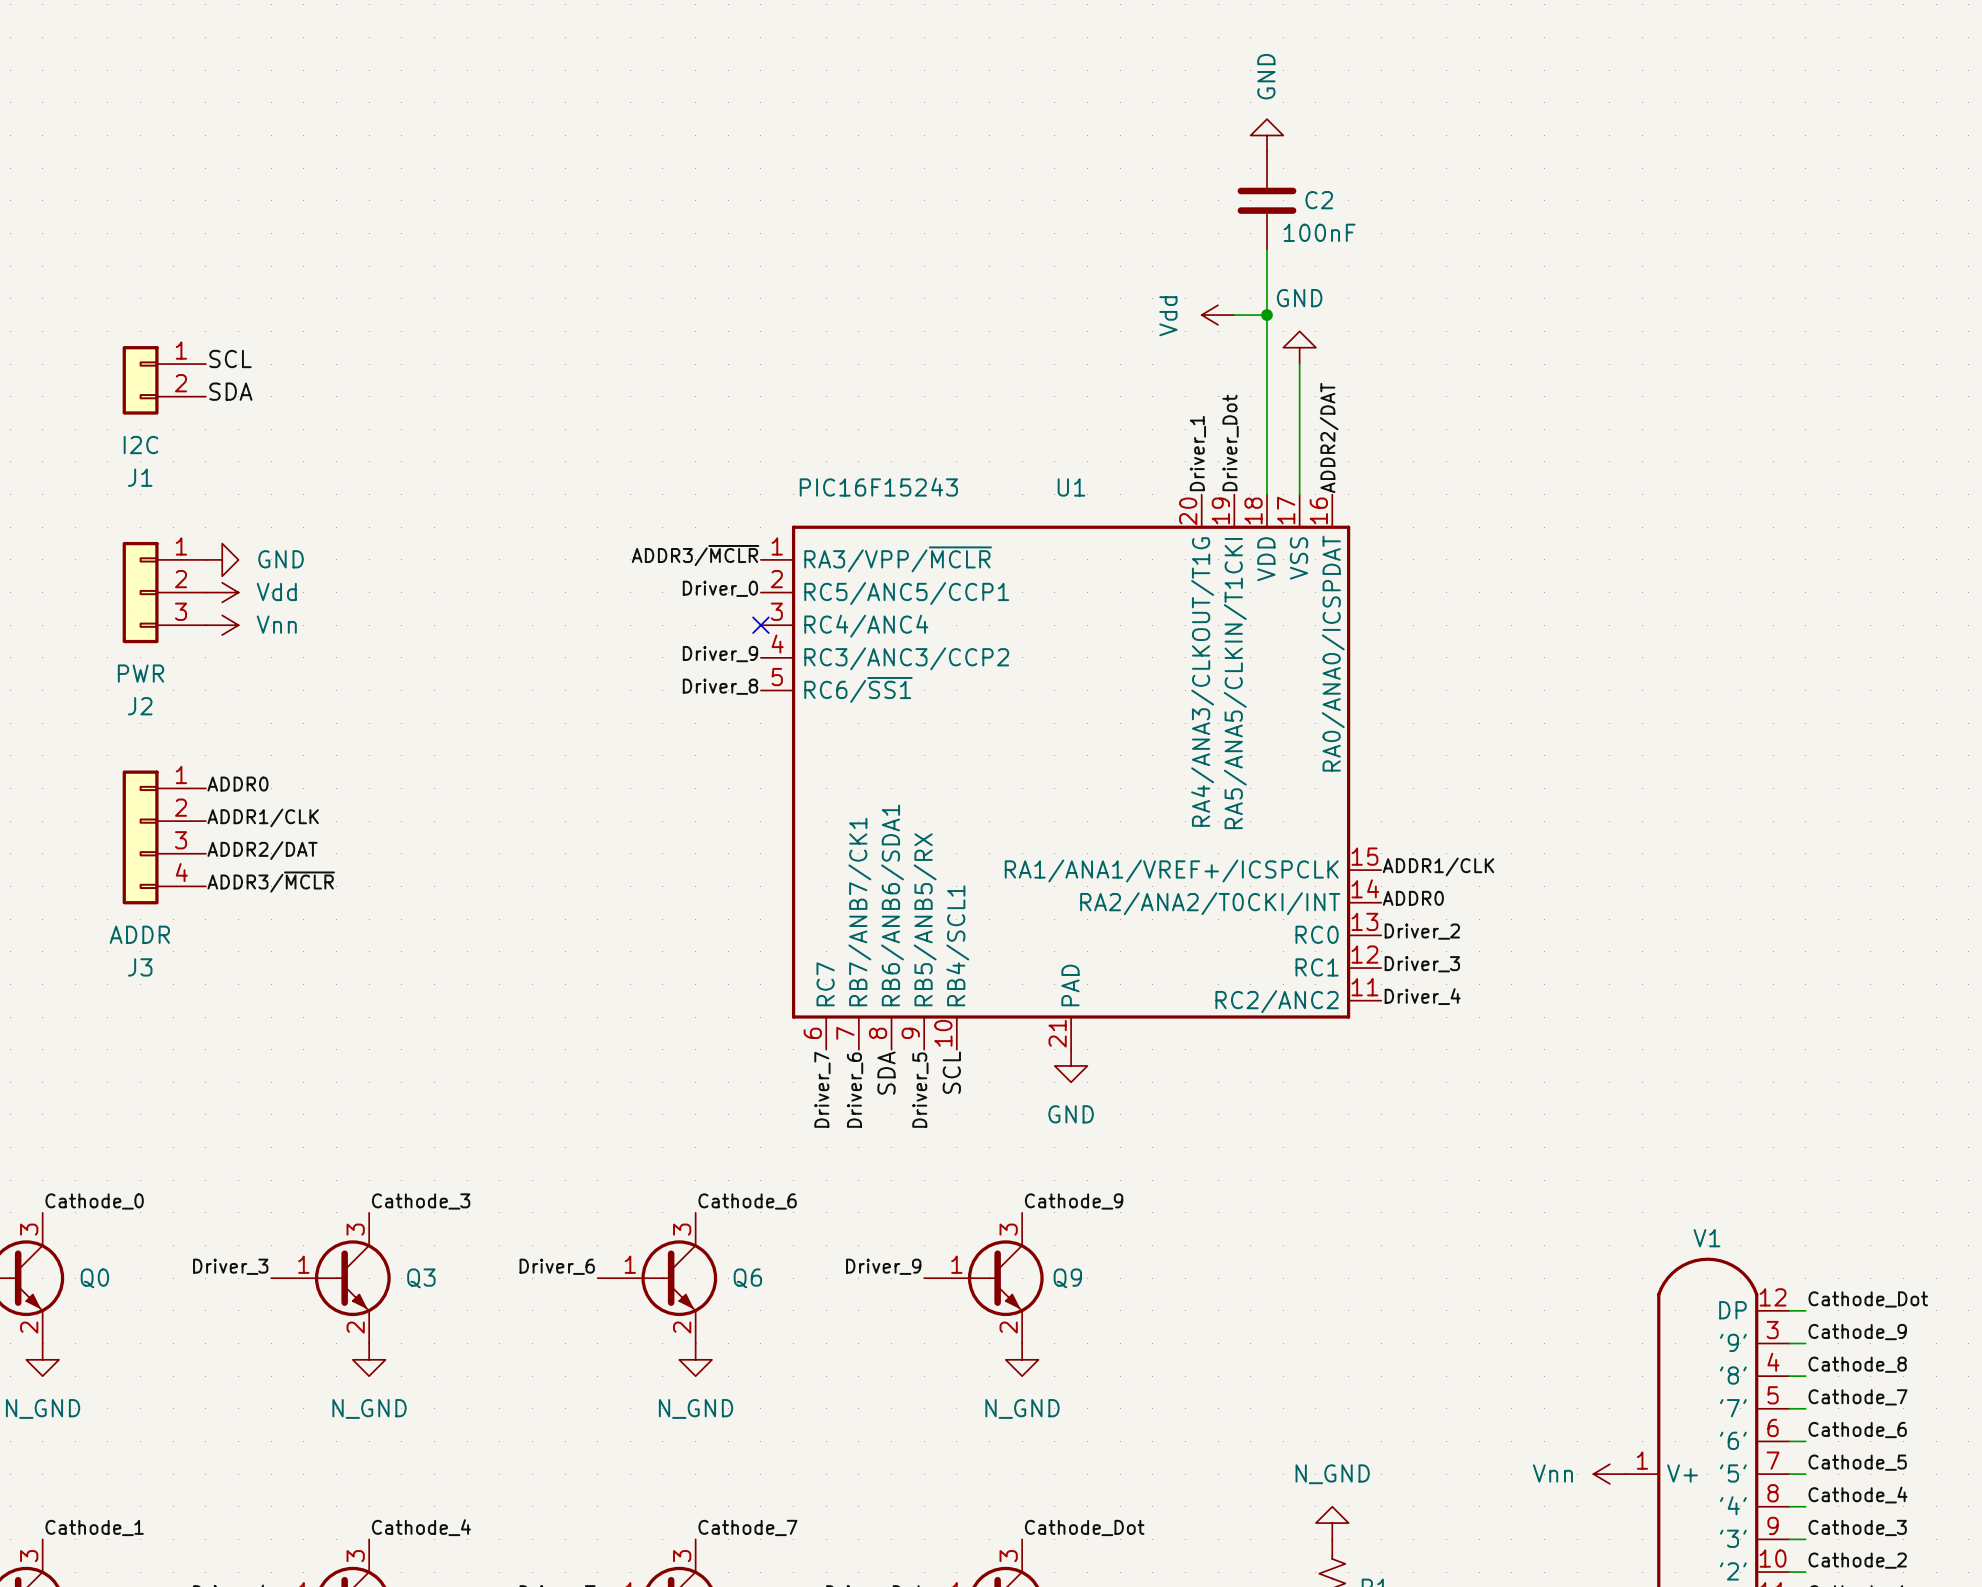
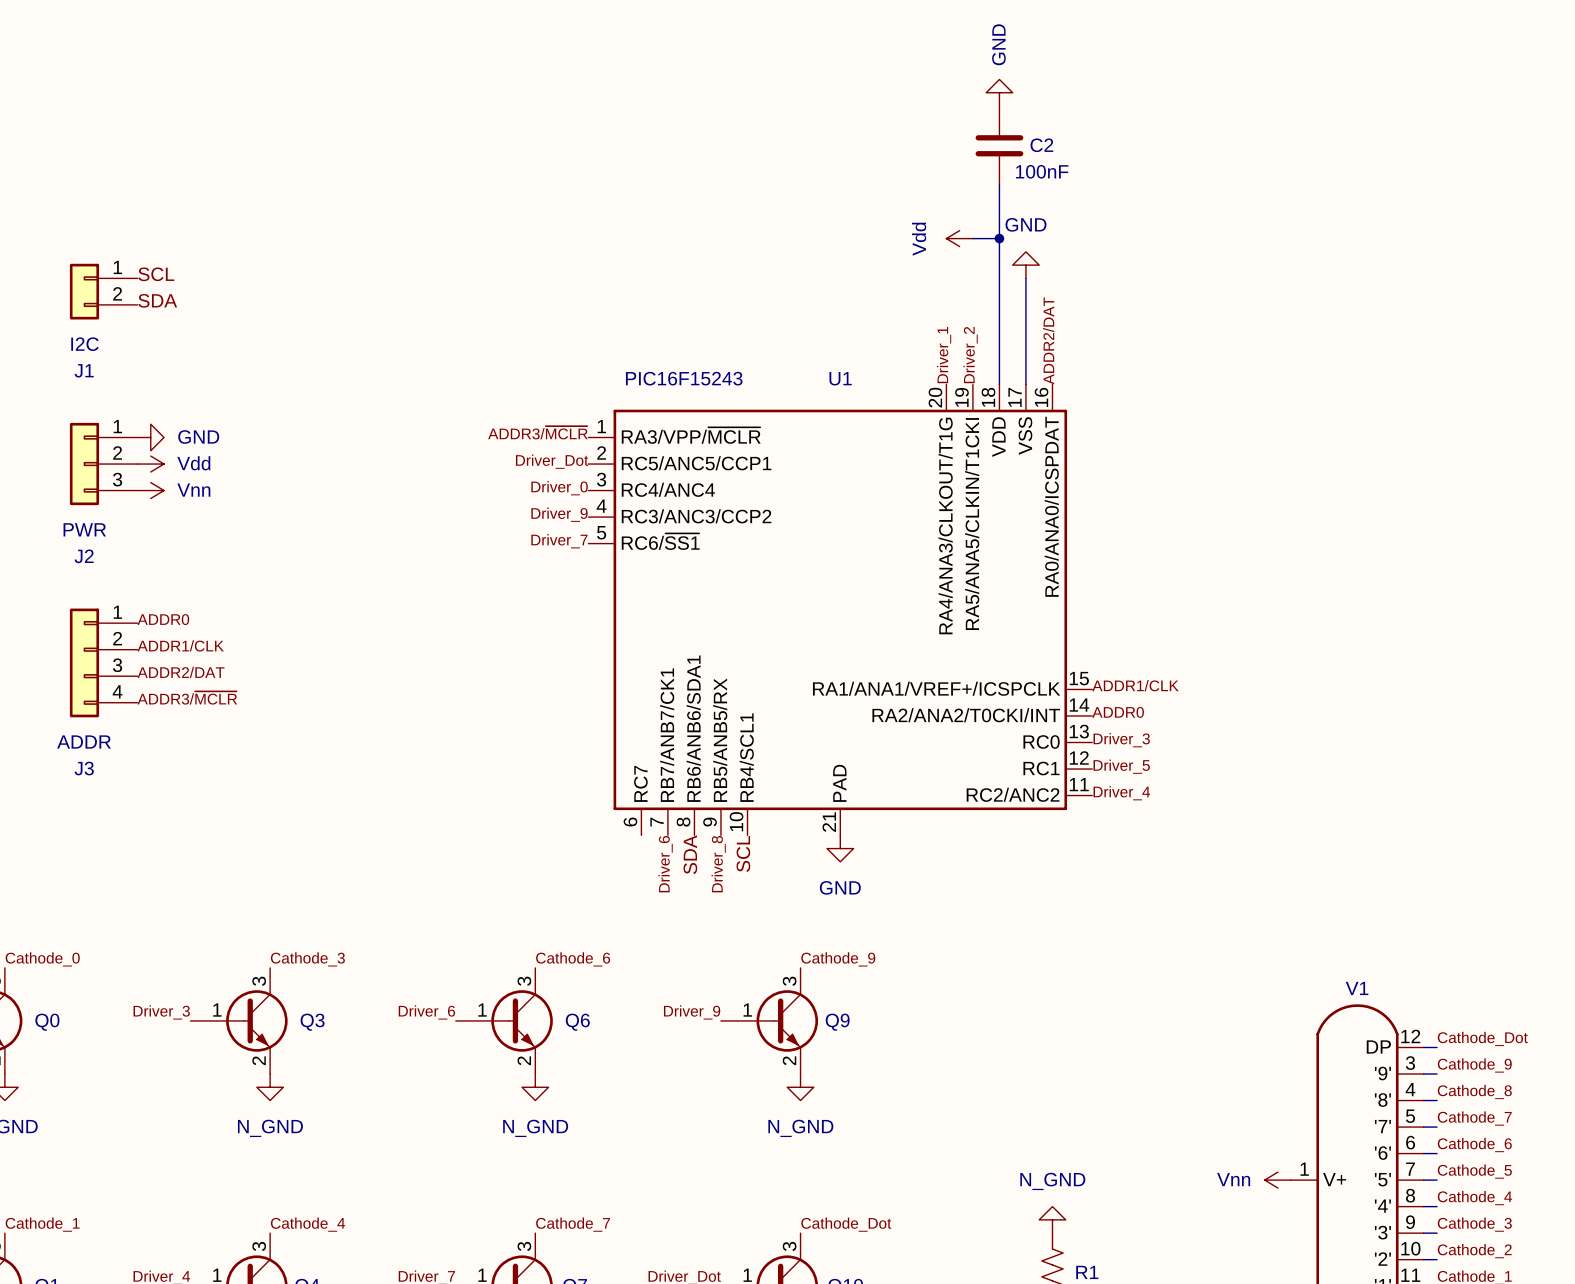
label: Driver_Dot (1230, 442) -> Driver_2 (970, 355)
label: Driver_0 (720, 588) -> Driver_Dot (552, 461)
label: none -> Driver_0 (559, 488)
no-connect mark: (760, 625) -> none
label: Driver_8 (720, 686) -> Driver_7 (559, 541)
label: Driver_2 (1422, 931) -> Driver_3 (1121, 740)
label: Driver_3 (1422, 964) -> Driver_5 (1121, 766)
label: Driver_7 (822, 1089) -> none
label: Driver_5 (920, 1090) -> Driver_8 (718, 864)

